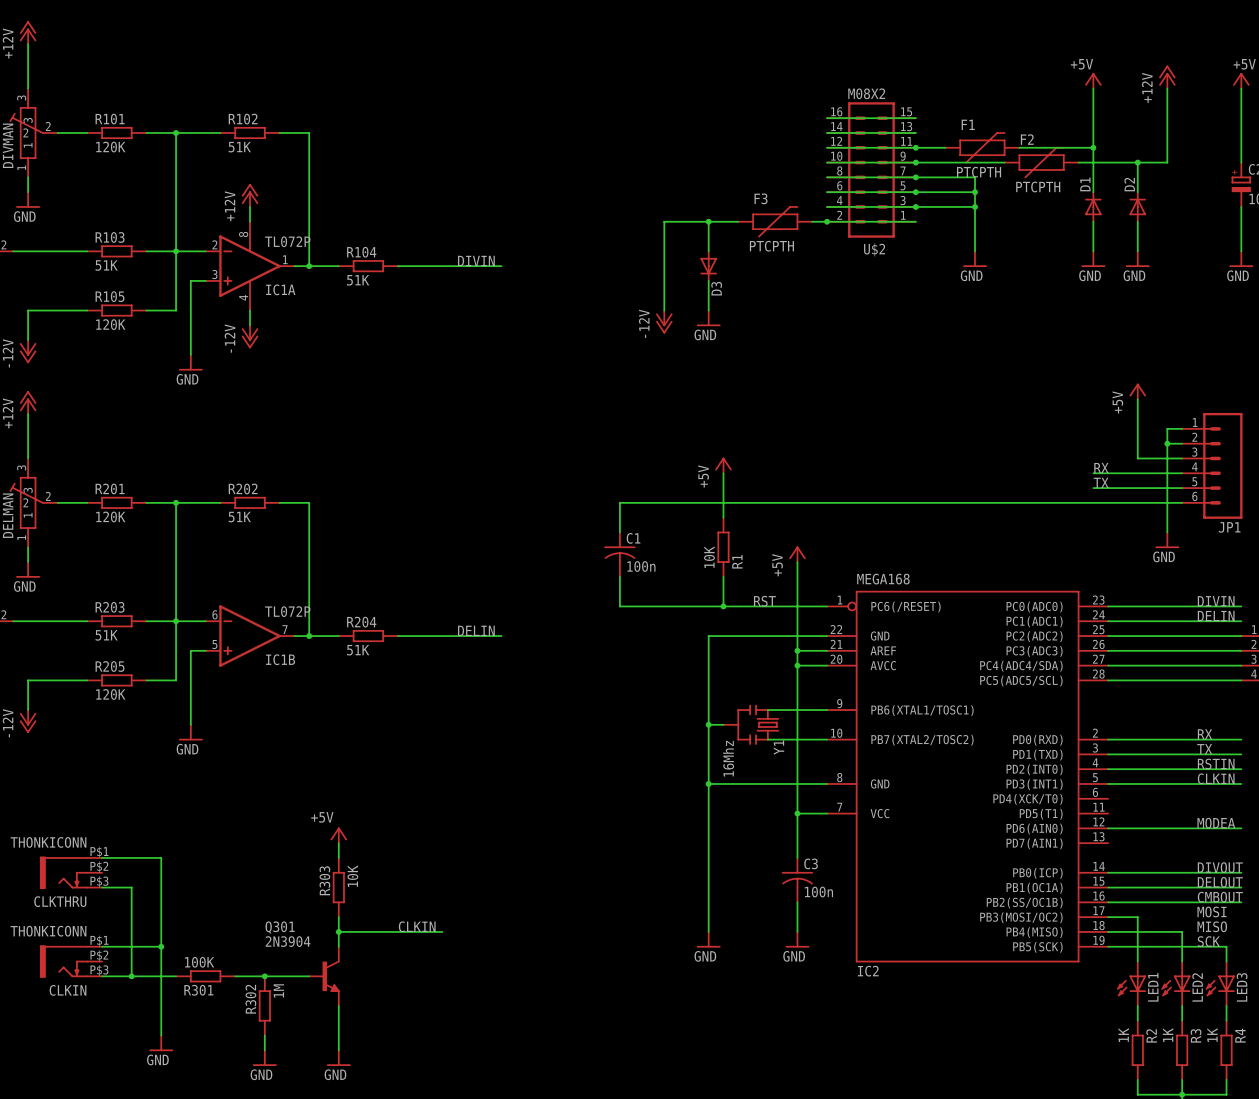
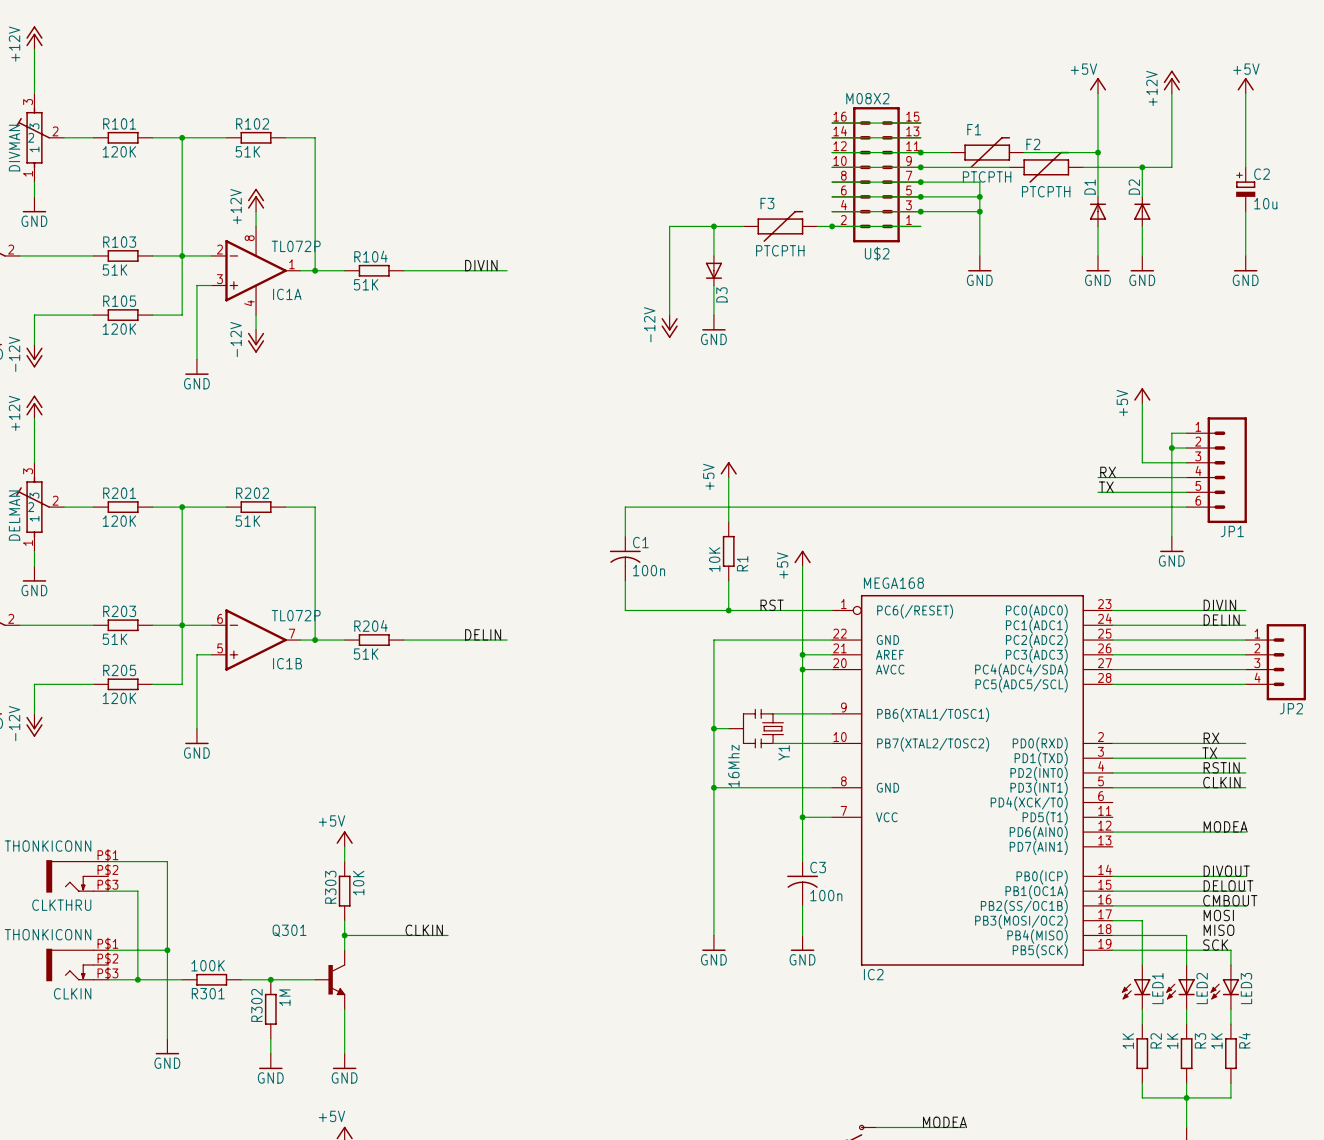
Q301 value: 2N3904 (288, 941) -> none

